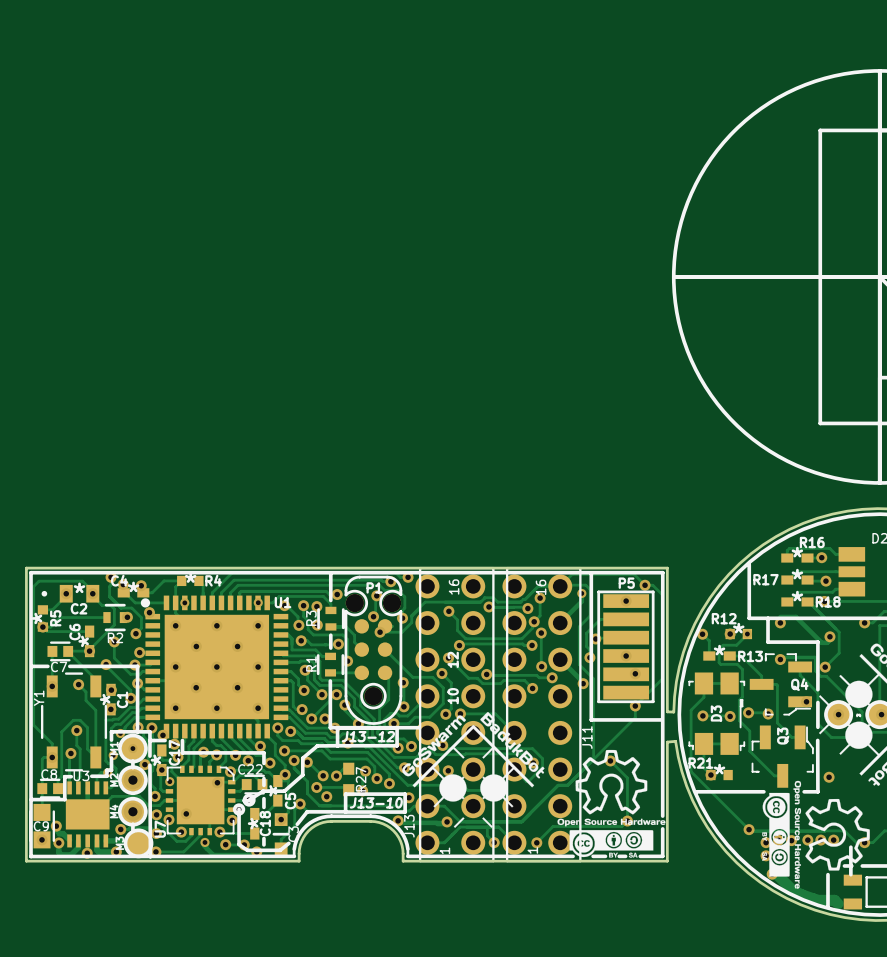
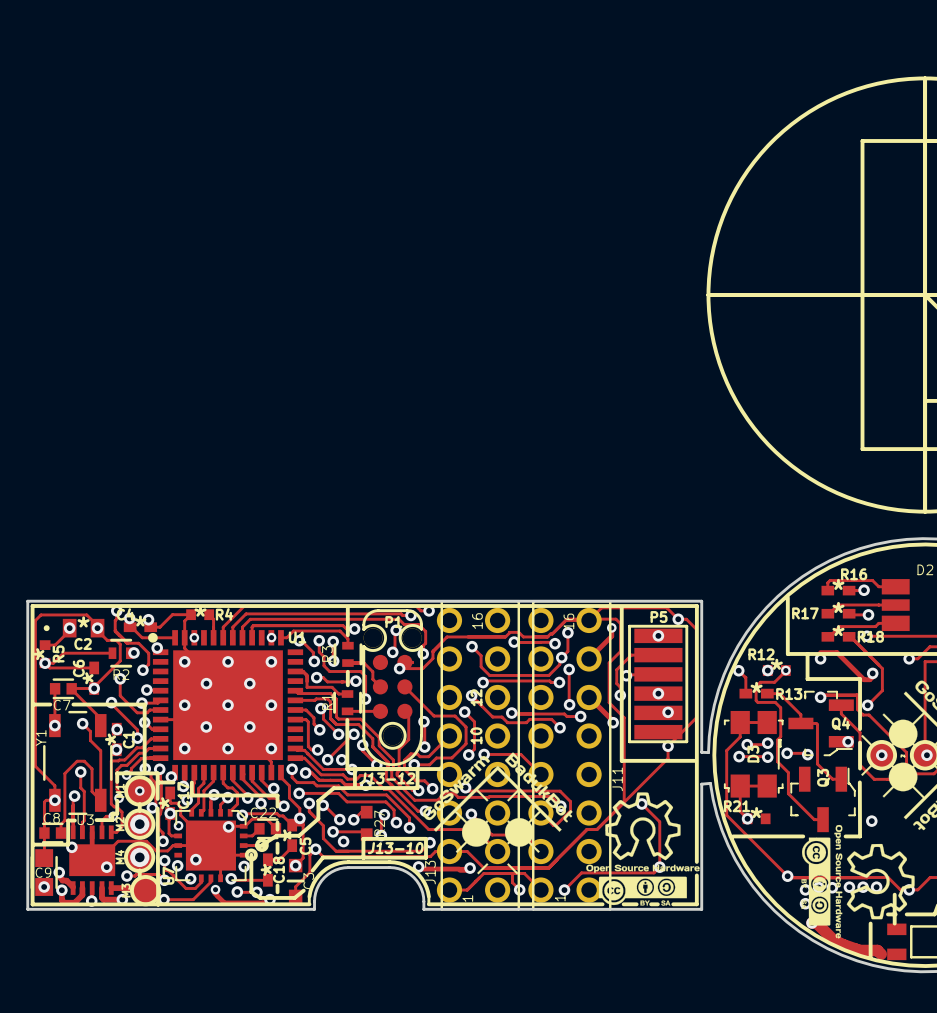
track: none -> (767, 743) (747, 744)
via: none -> (767, 743)
via: none -> (747, 744)
via: none -> (71, 847)
via: none -> (106, 867)

